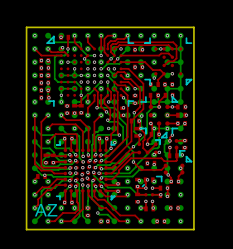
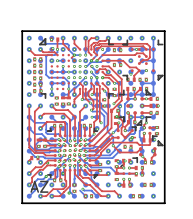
via: none -> (74, 55)
via: (84, 58) -> none
via: (111, 58) -> none
via: (117, 58) -> none
via: none -> (74, 60)
via: none -> (91, 60)
via: none -> (97, 60)
top track: (114, 82) (117, 85) (125, 85) (127, 87) -> none
via: none -> (97, 77)
via: none -> (102, 77)
bottom track: (134, 112) (134, 131) (140, 135) -> none
via: none -> (116, 116)
bottom track: (119, 134) (97, 134) (95, 137) -> none
via: none -> (132, 137)
via: (159, 152) -> none
bottom track: none -> (70, 155) (57, 169) (57, 176) (54, 179) (49, 179) (43, 184) (40, 184)
bottom track: (69, 180) (62, 180) (54, 188) (44, 188) (41, 191) (41, 204) -> (46, 176) (34, 182)
bottom track: (75, 180) (79, 184) (79, 216) (74, 221) -> (57, 190) (63, 196)
via: none -> (47, 163)
via: none -> (63, 173)
via: none -> (46, 176)
via: (48, 208) -> none
bottom track: none -> (80, 190) (85, 196)
via: none -> (69, 193)

